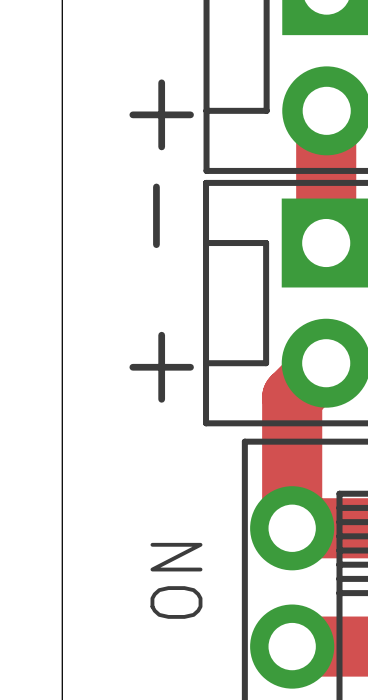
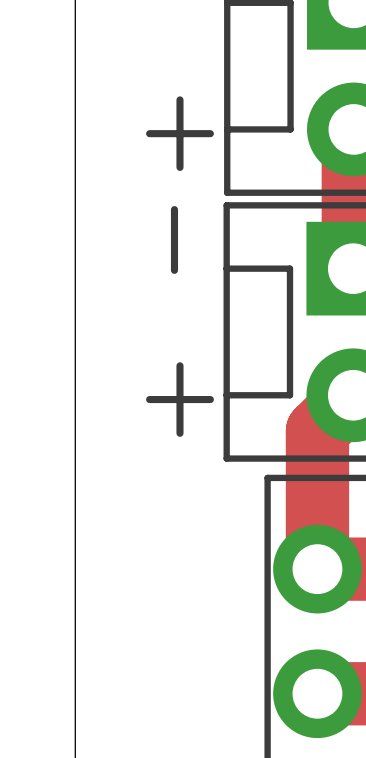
text: ON (176, 580) -> none

